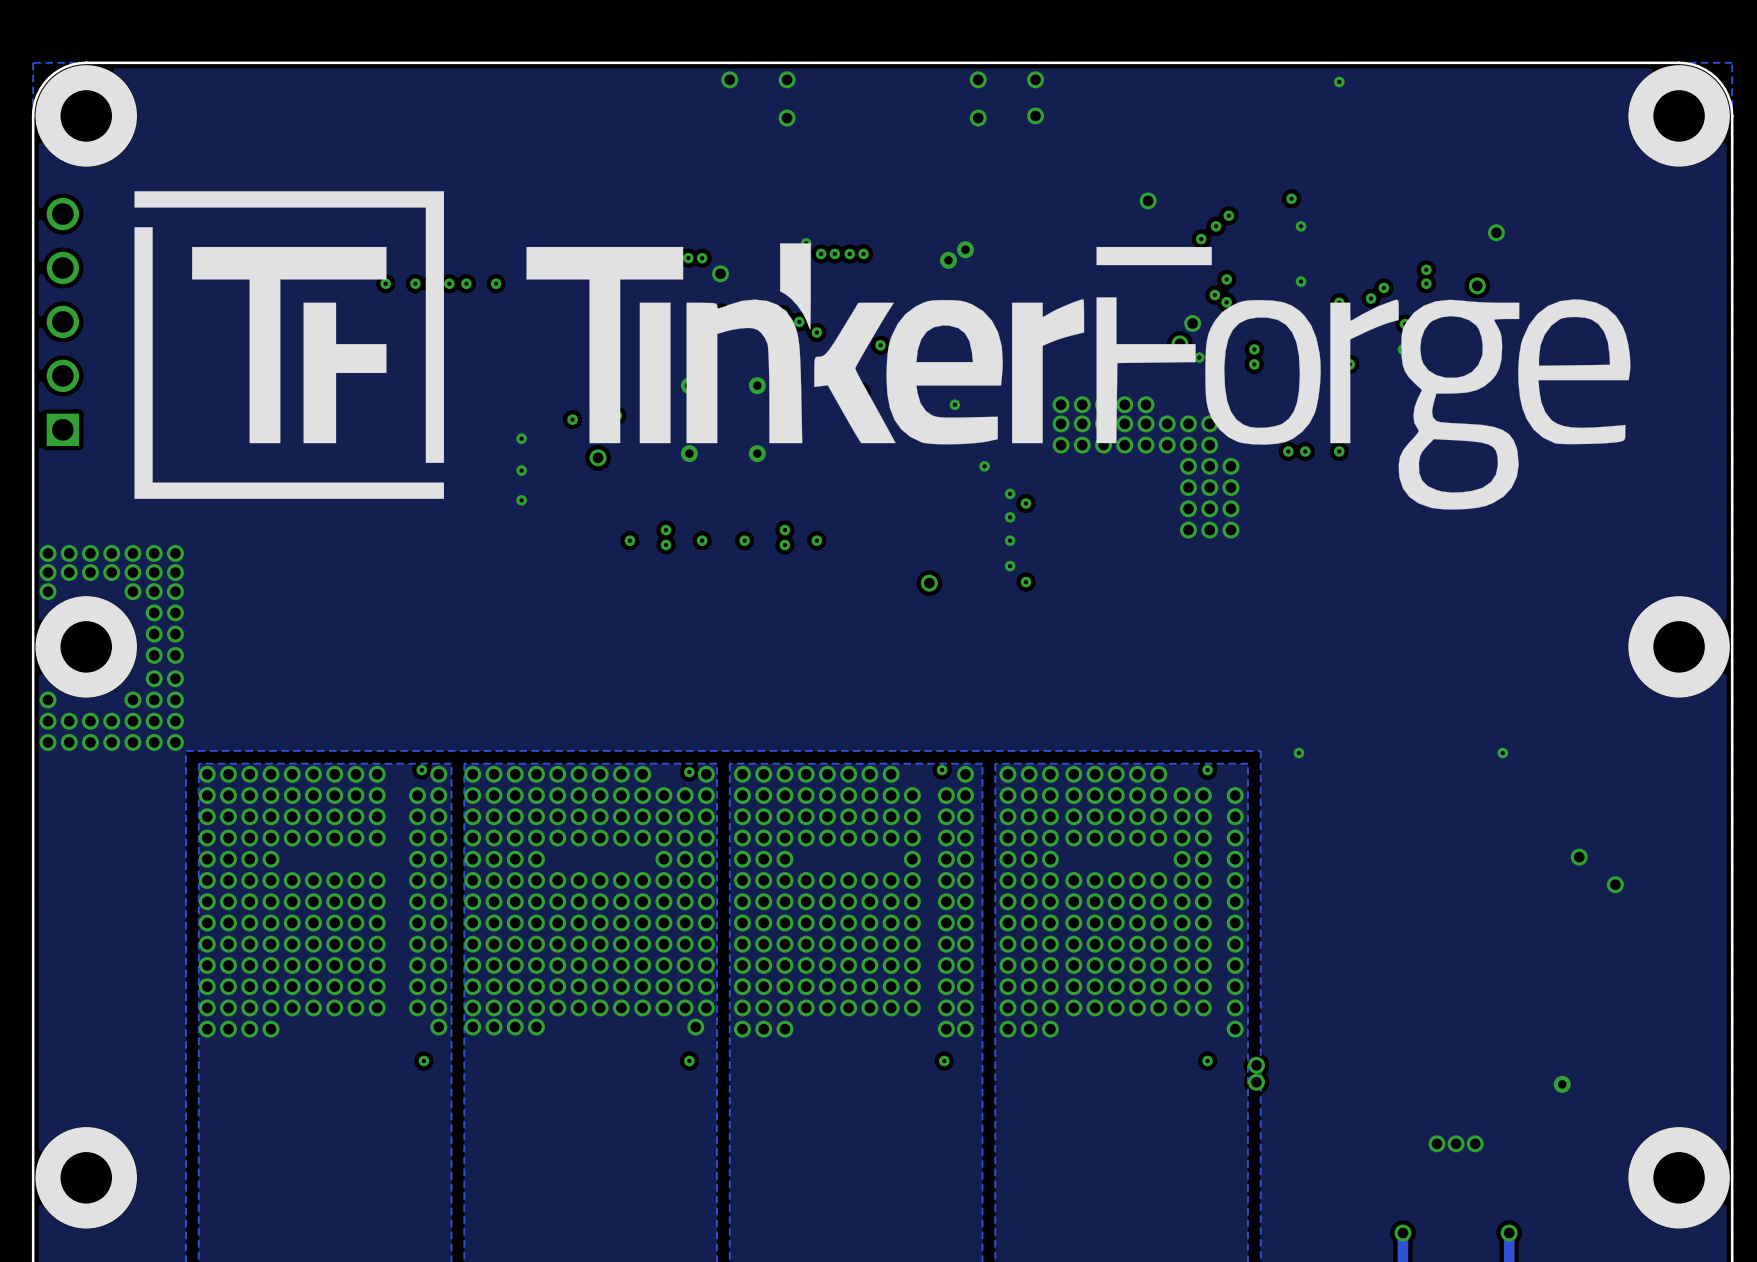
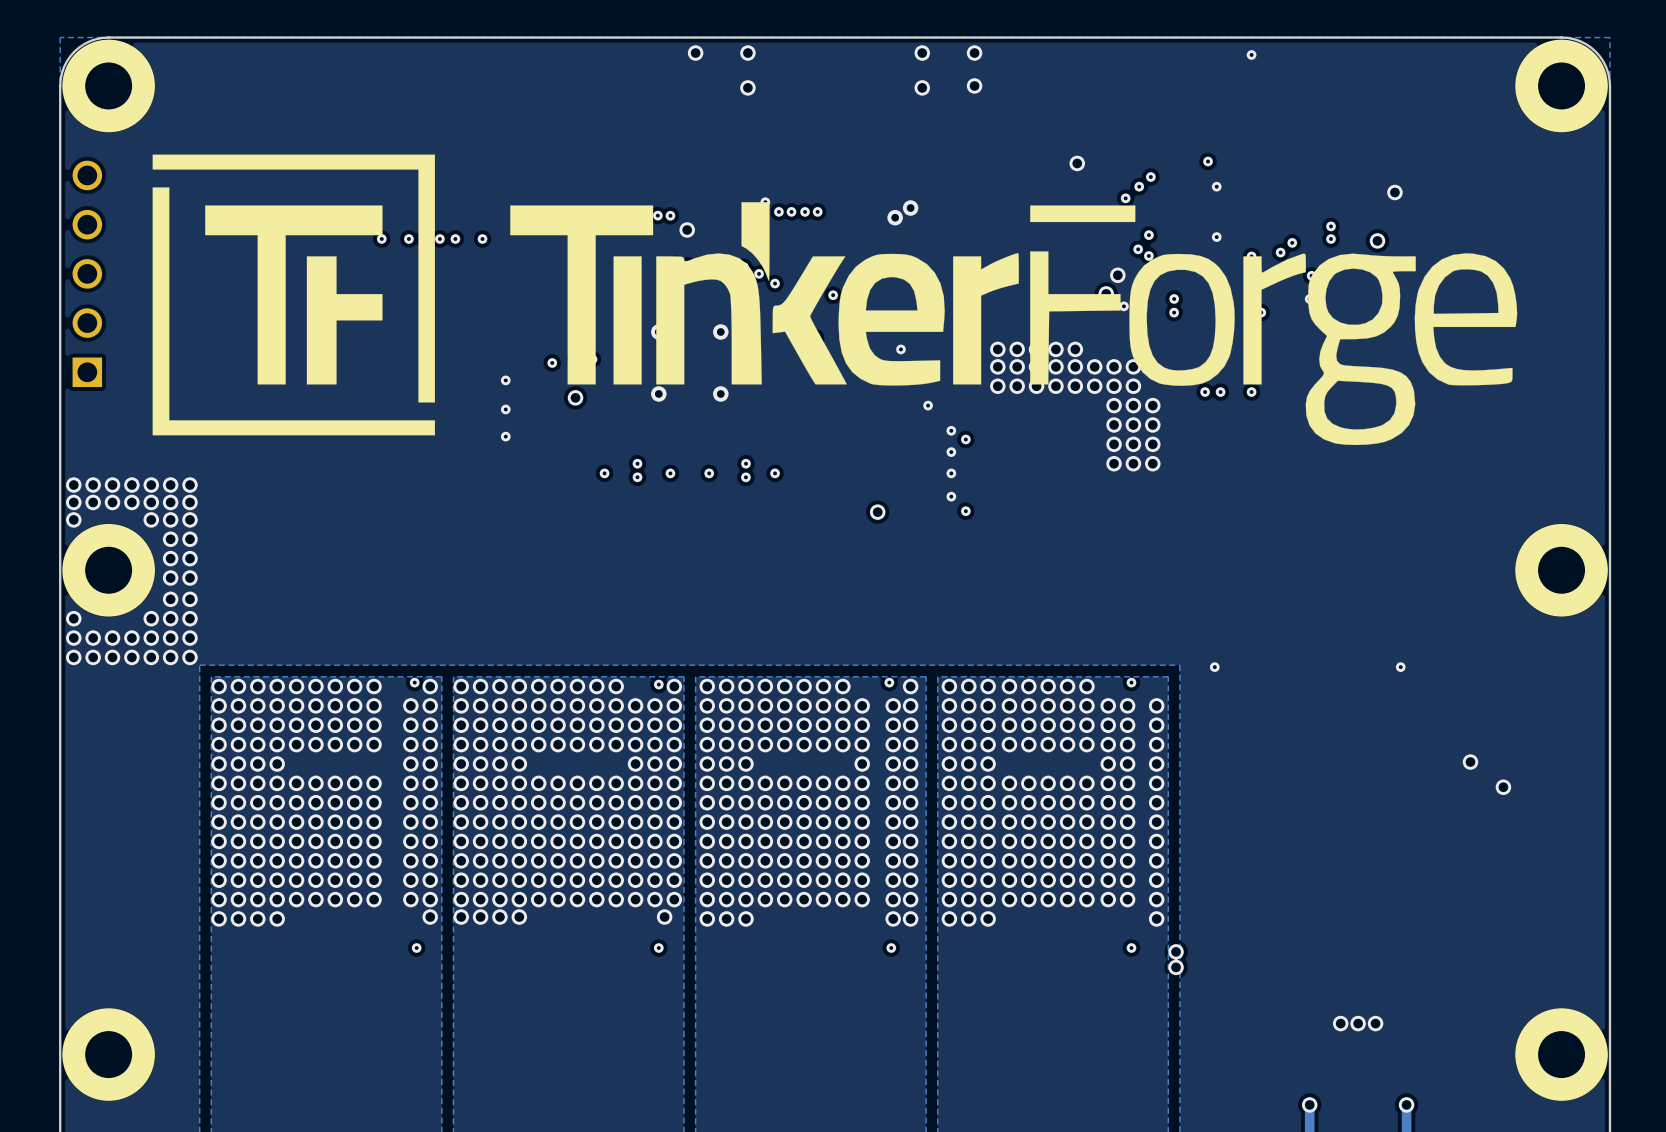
via: (1562, 1084) -> none

